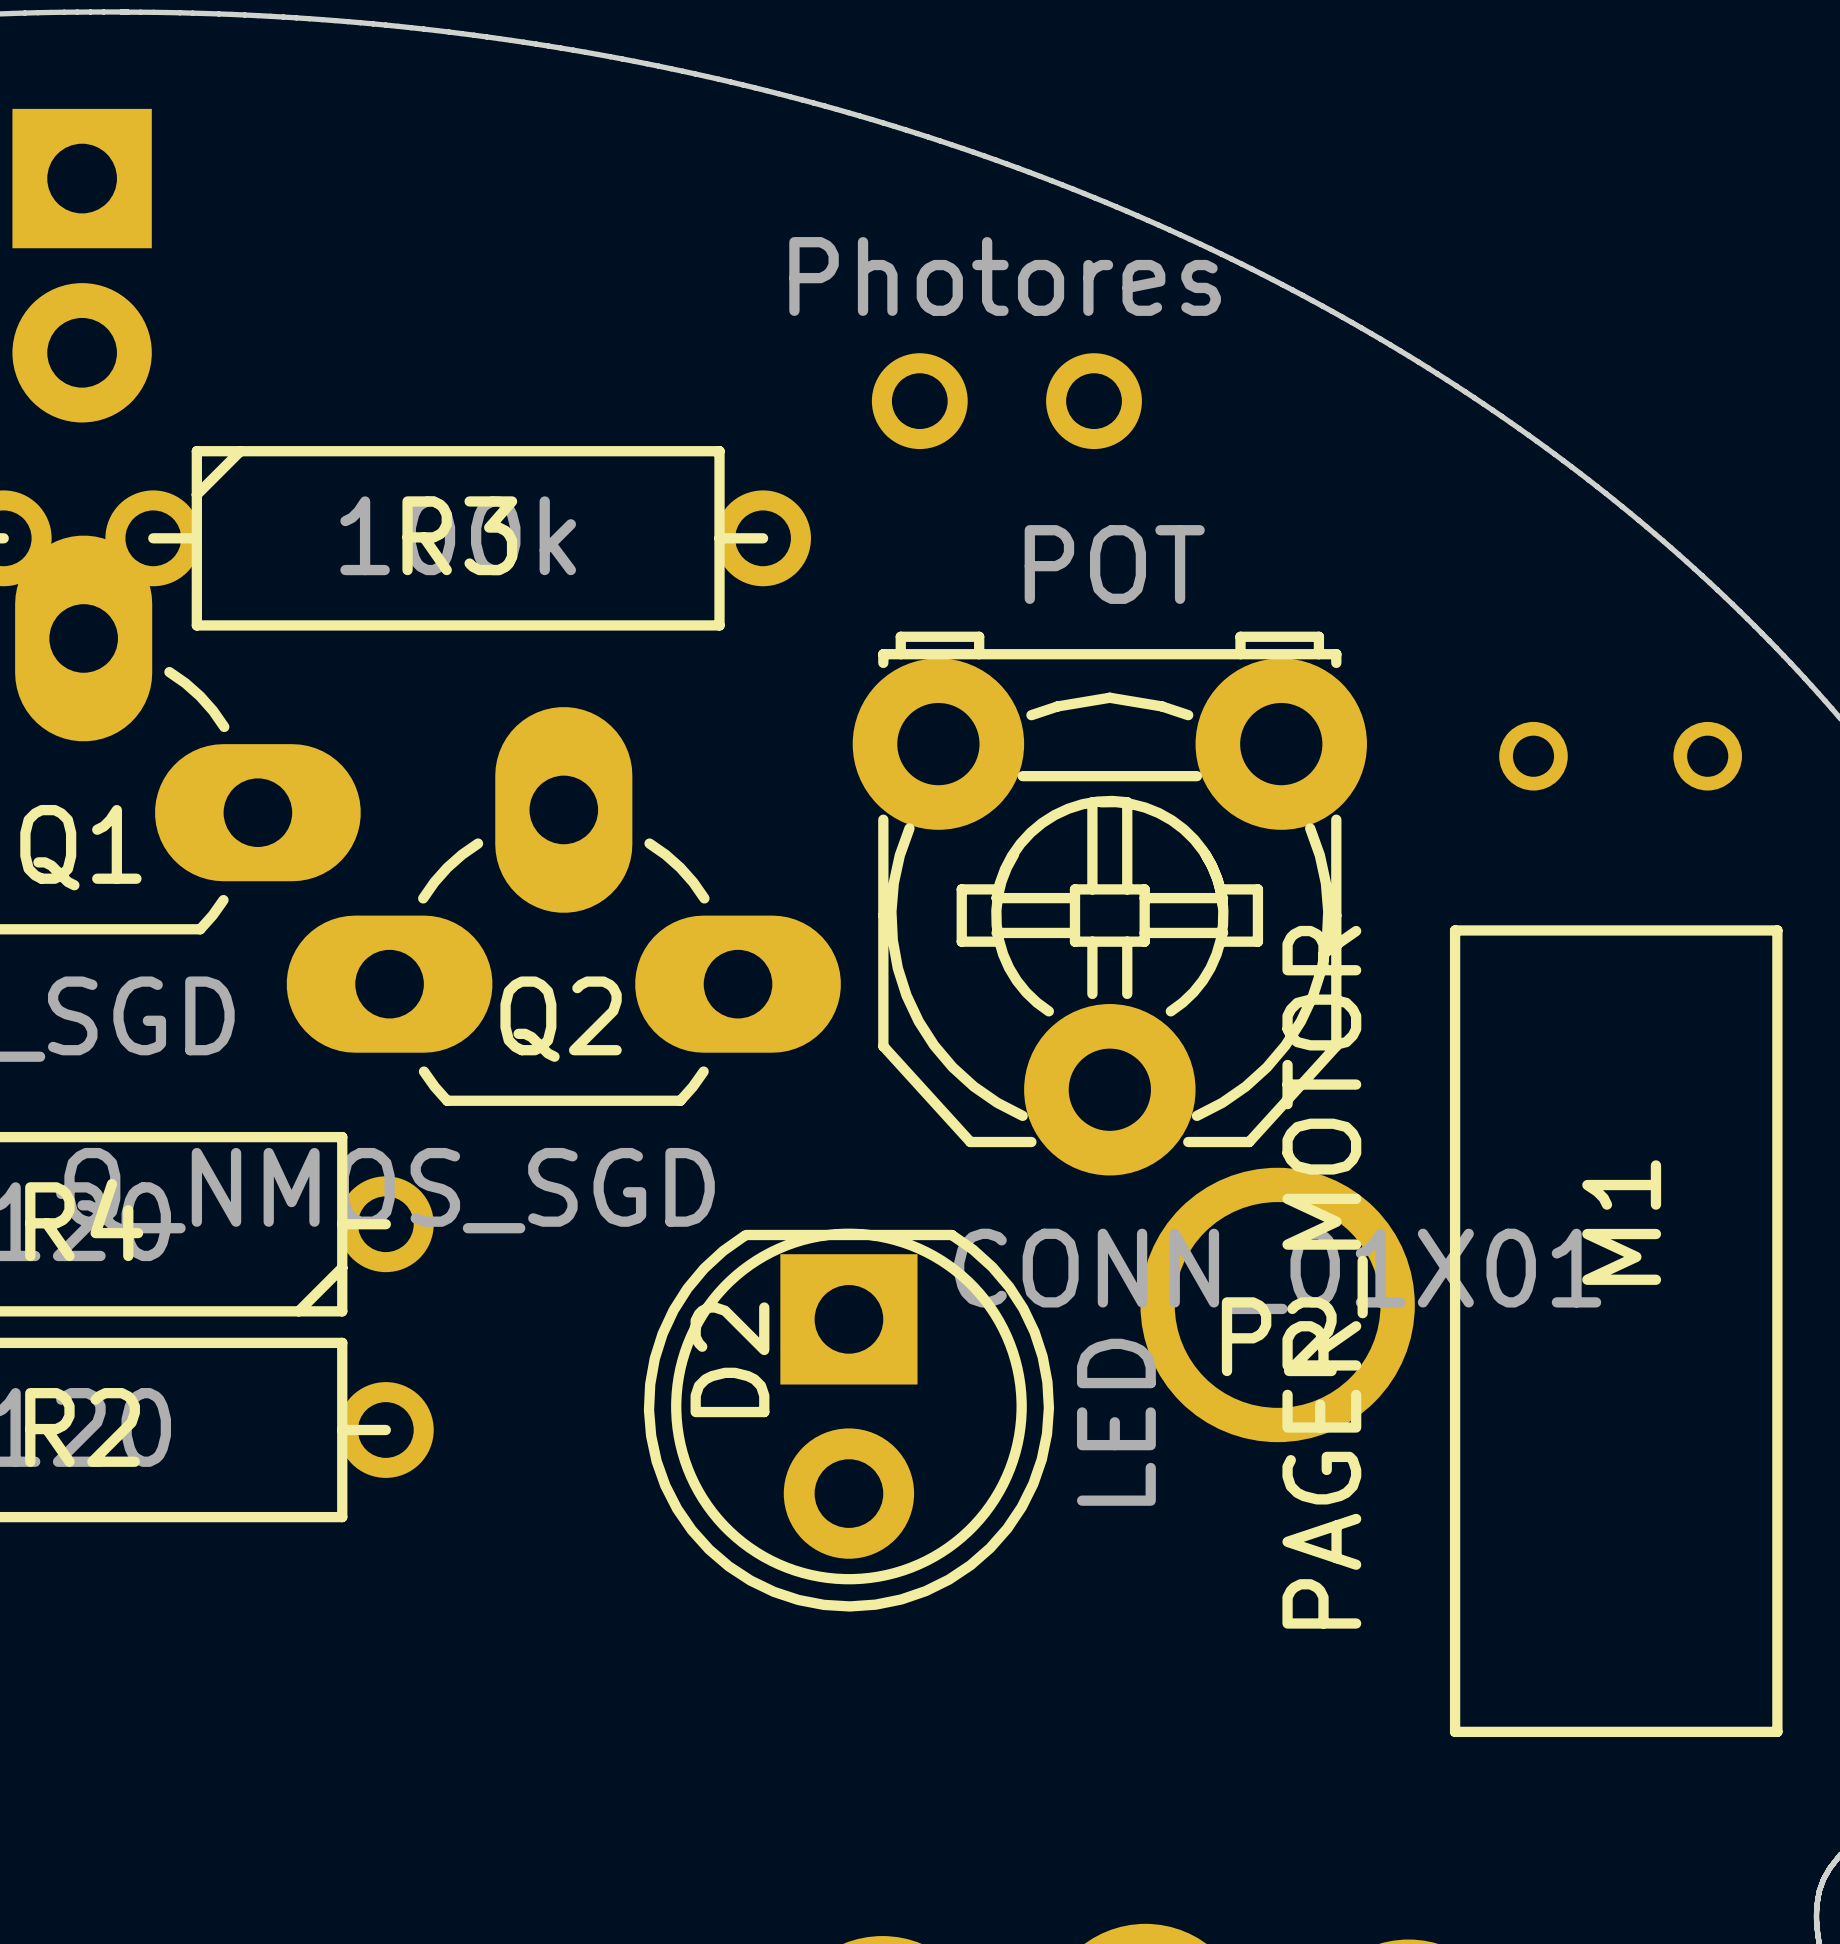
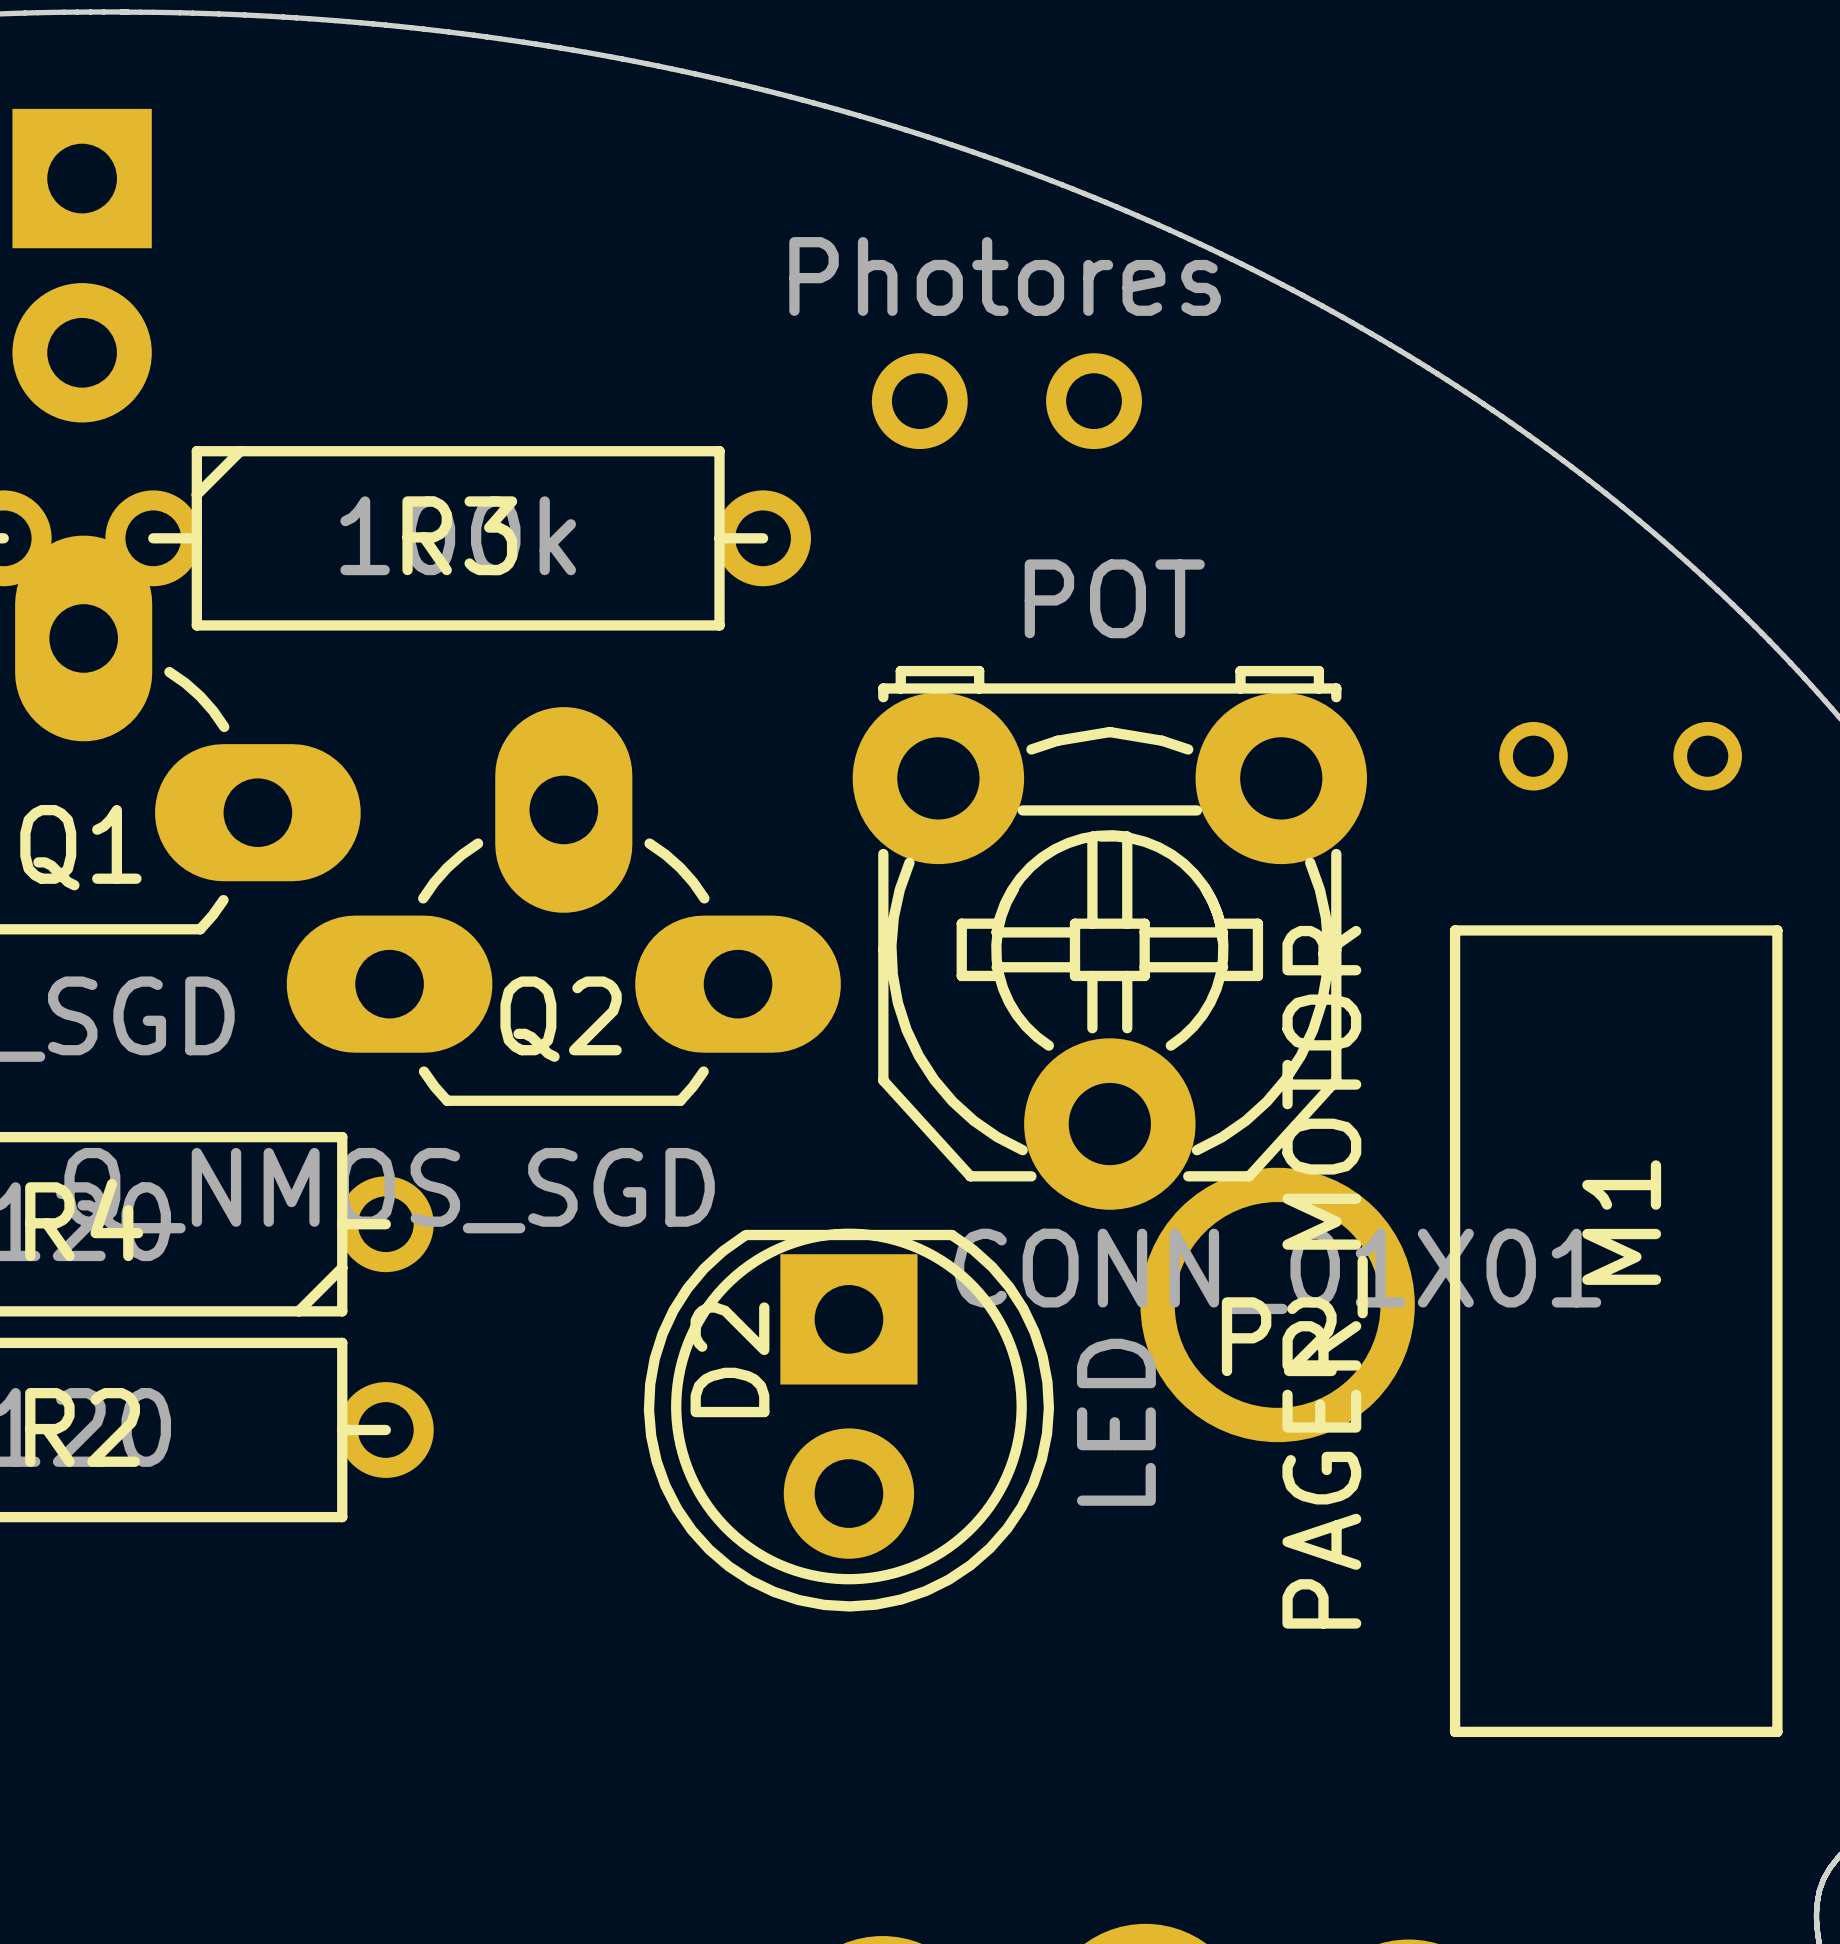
part position: (1109, 903) -> (1109, 937)

